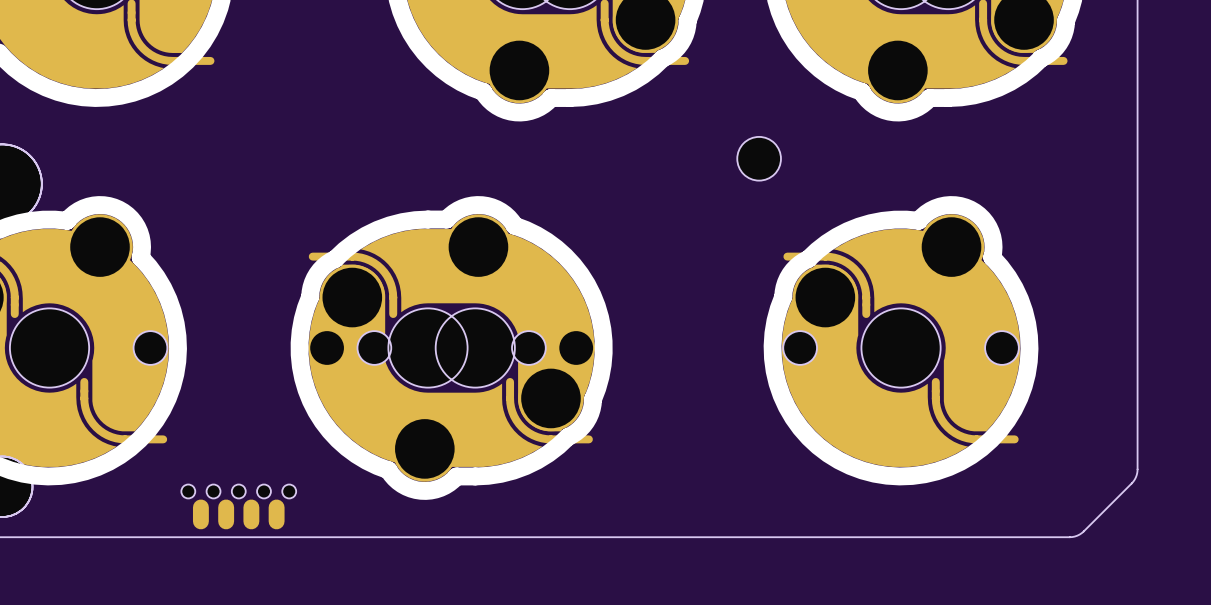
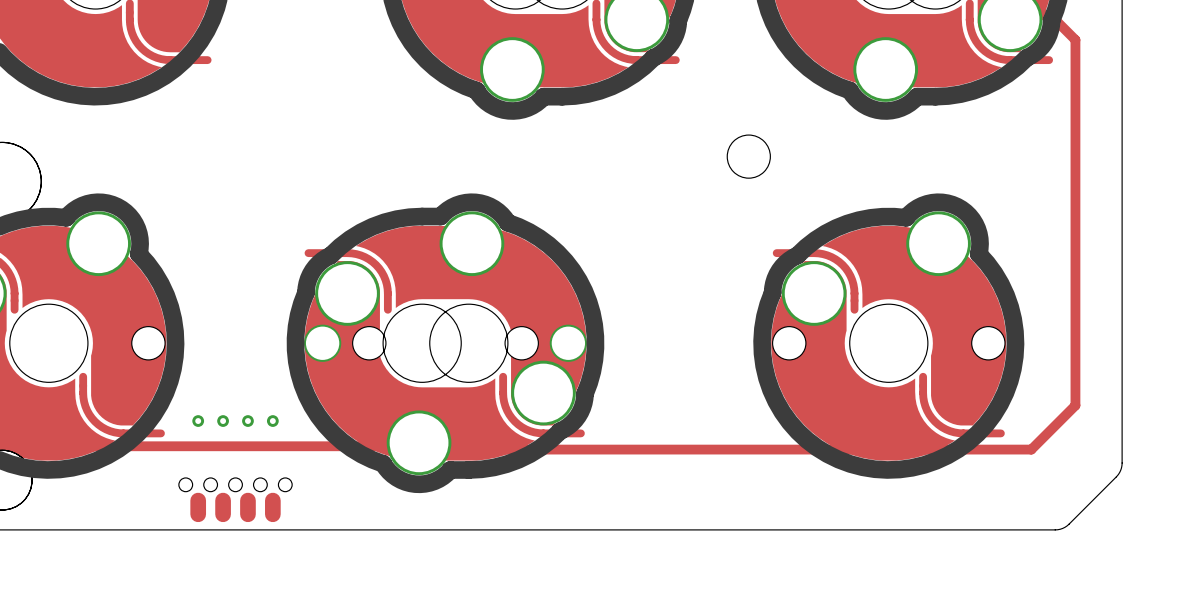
track: none -> (1014, 15) (1050, 15) (1075, 39) (1075, 405) (1031, 449) (443, 449)
via: none -> (198, 421)
via: none -> (223, 421)
via: none -> (247, 421)
via: none -> (272, 421)
track: none -> (82, 446) (415, 446)

